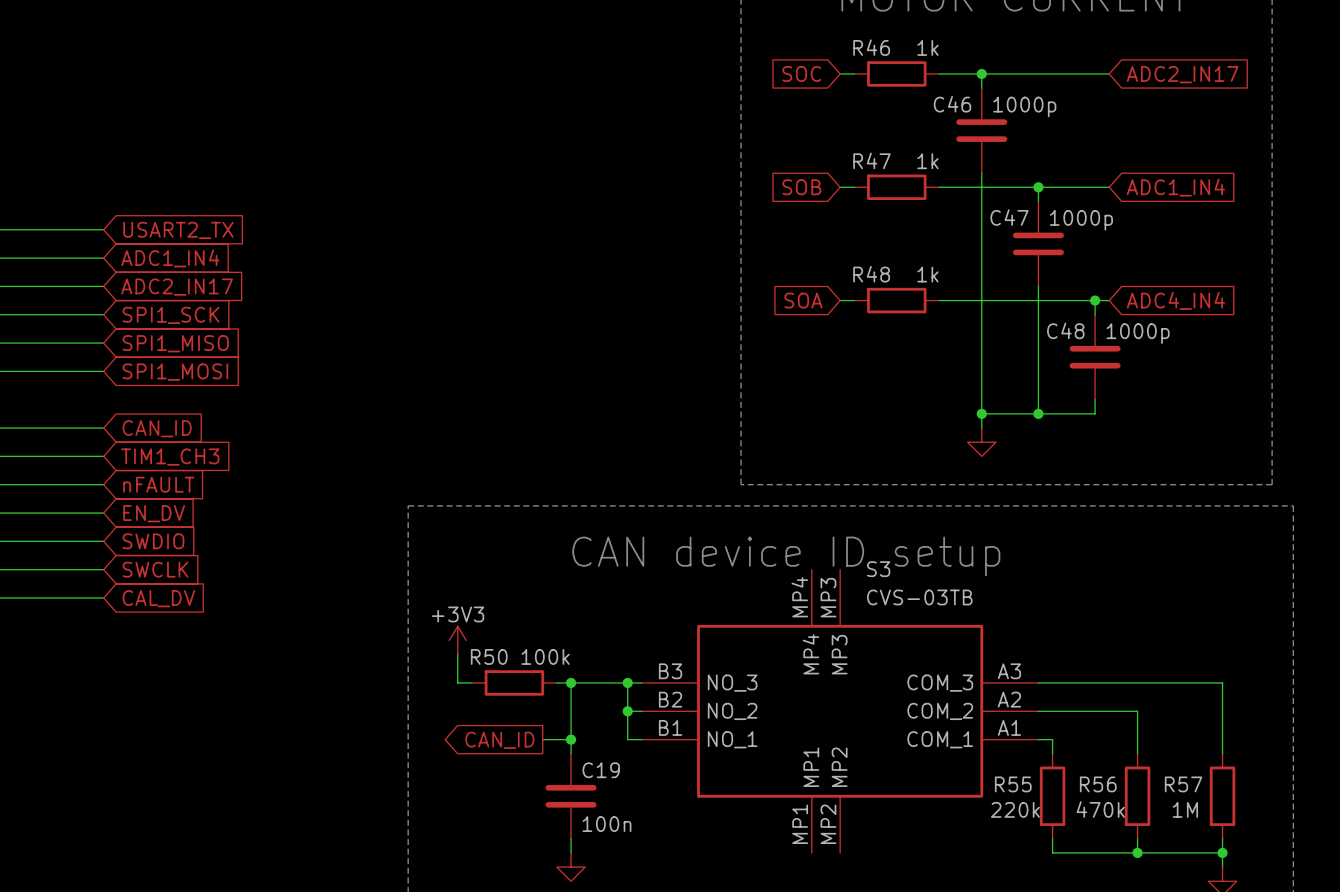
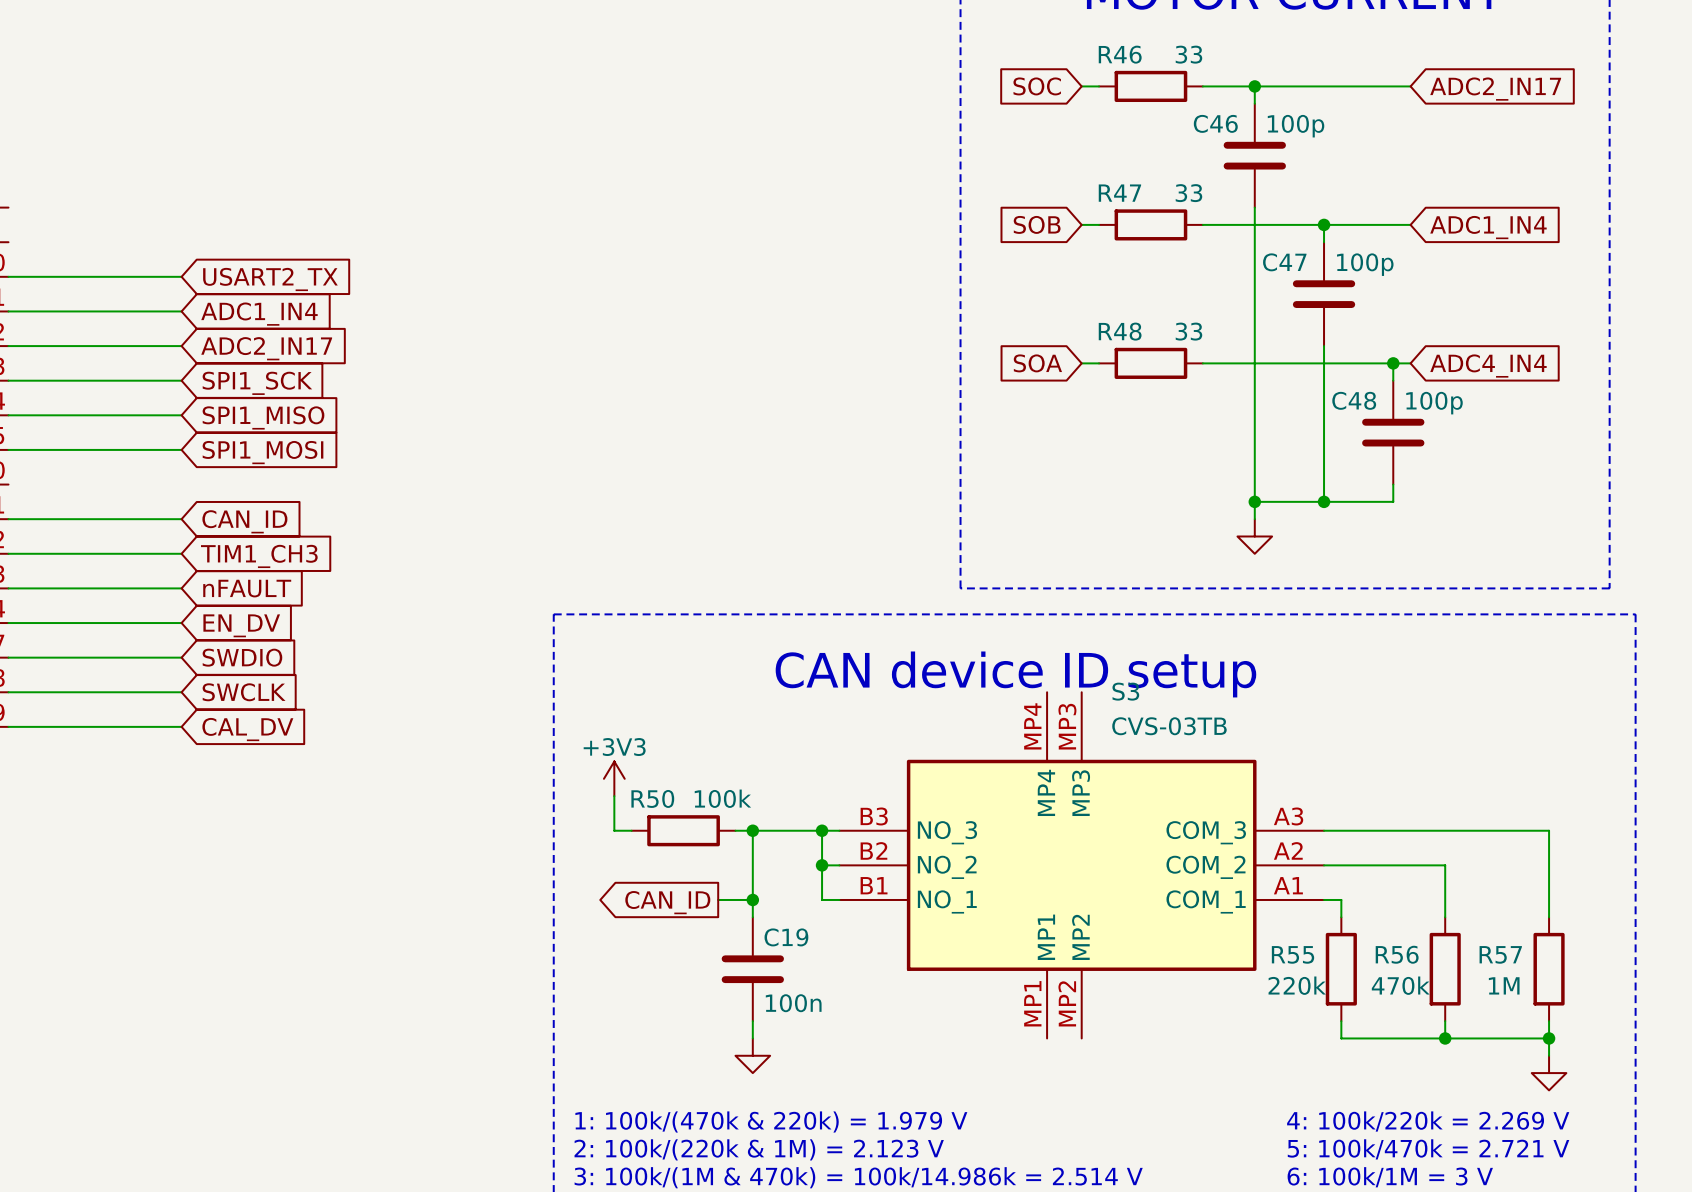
R46 value: 1k (927, 47) -> 33 (1188, 54)
C46 value: 1000p (1024, 106) -> 100p (1296, 126)
R47 value: 1k (927, 161) -> 33 (1188, 193)
C47 value: 1000p (1081, 220) -> 100p (1365, 264)
R48 value: 1k (927, 274) -> 33 (1188, 331)
C48 value: 1000p (1138, 333) -> 100p (1434, 403)

